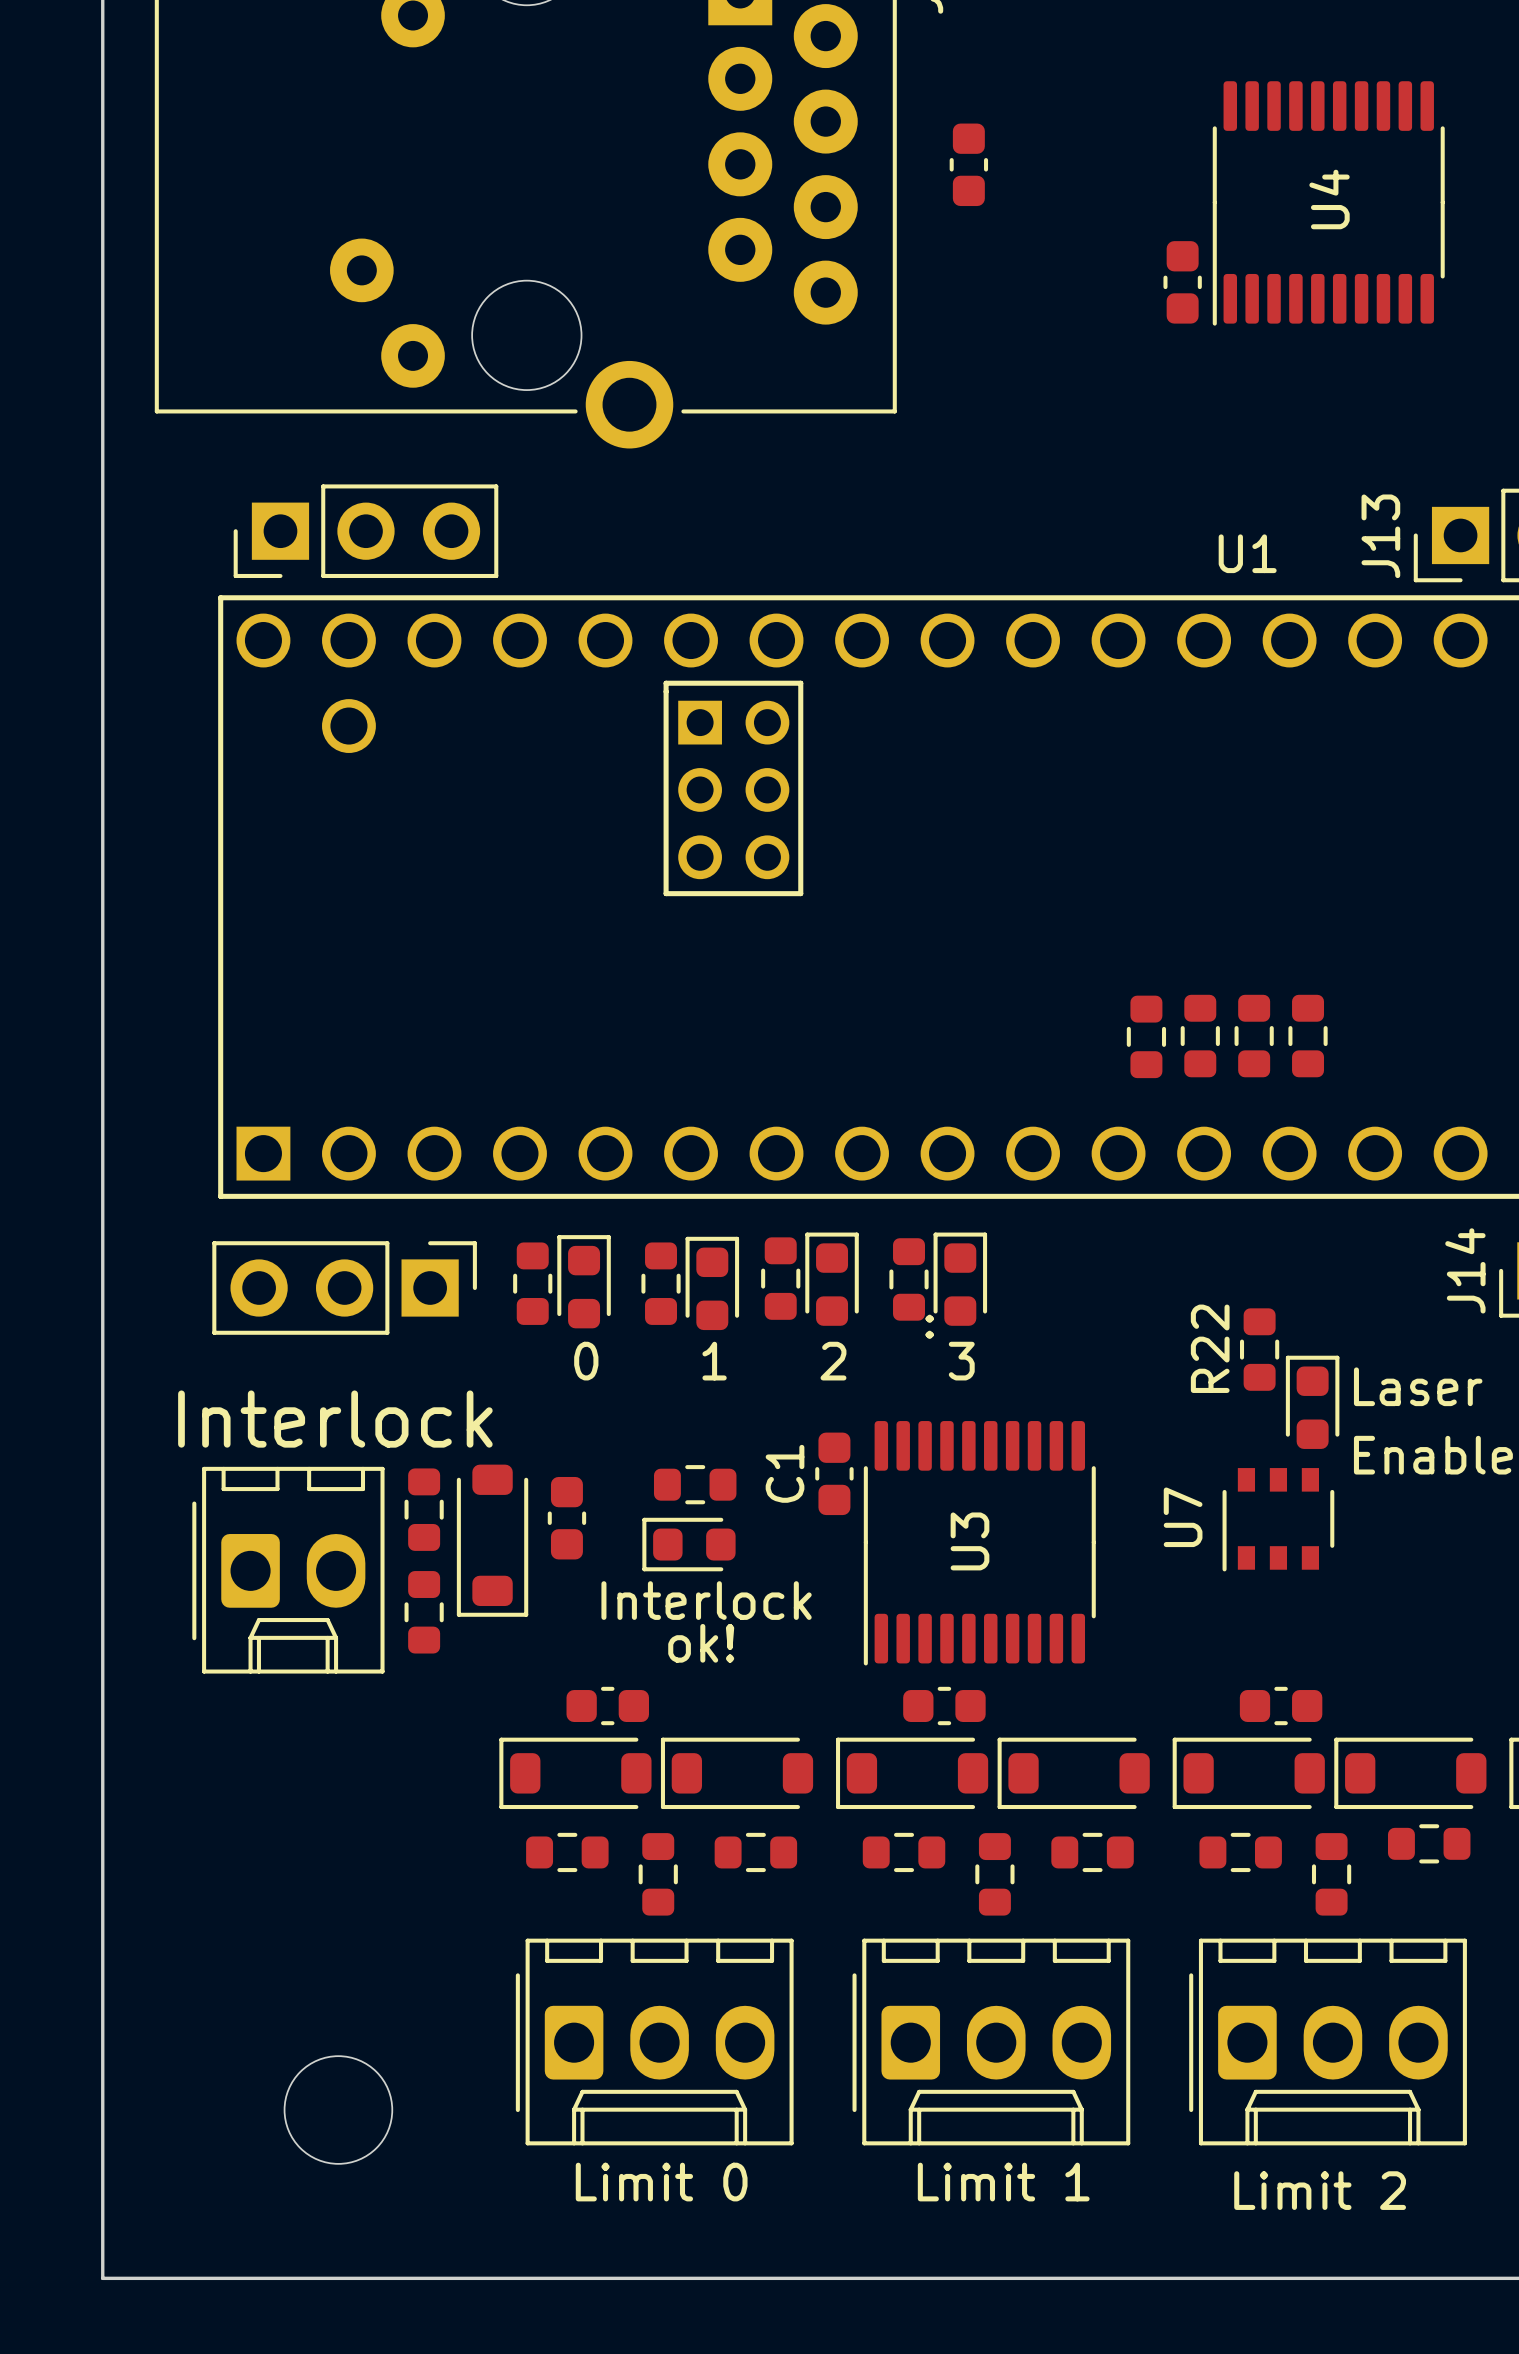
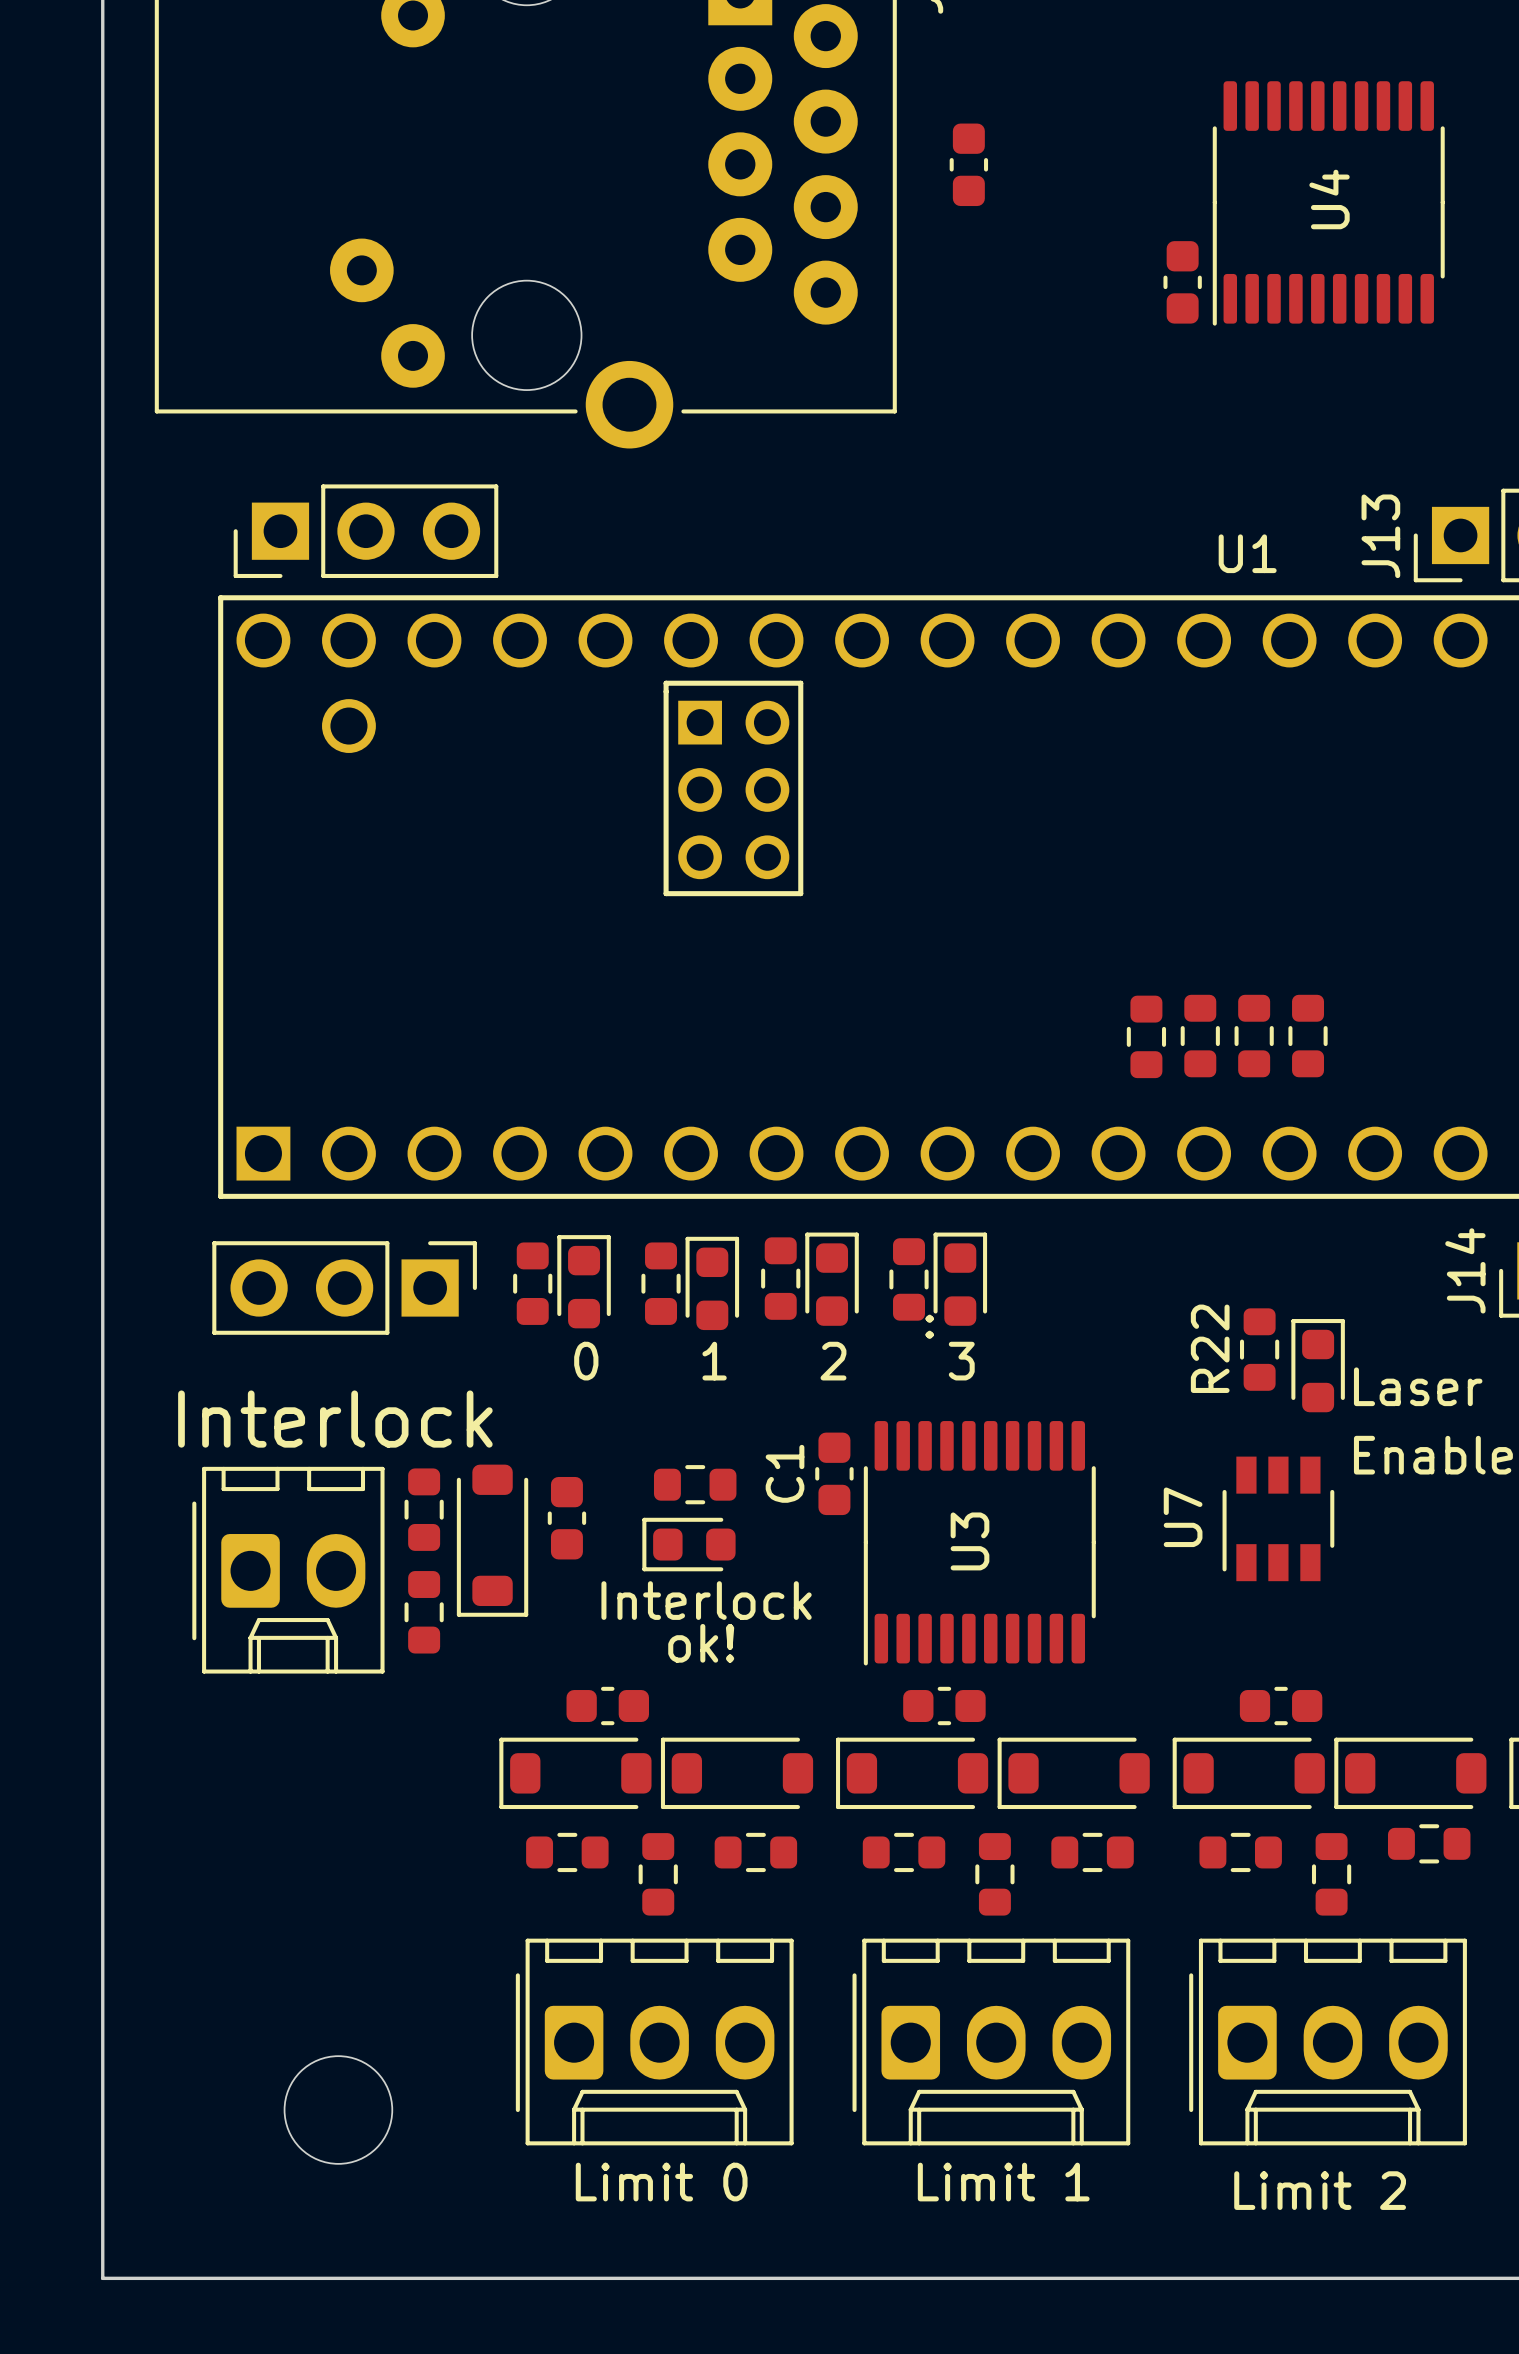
part position: (1312, 1402) -> (1318, 1365)
U7 footprint: [1222, 1468, 1335, 1572] -> [1222, 1456, 1335, 1582]

